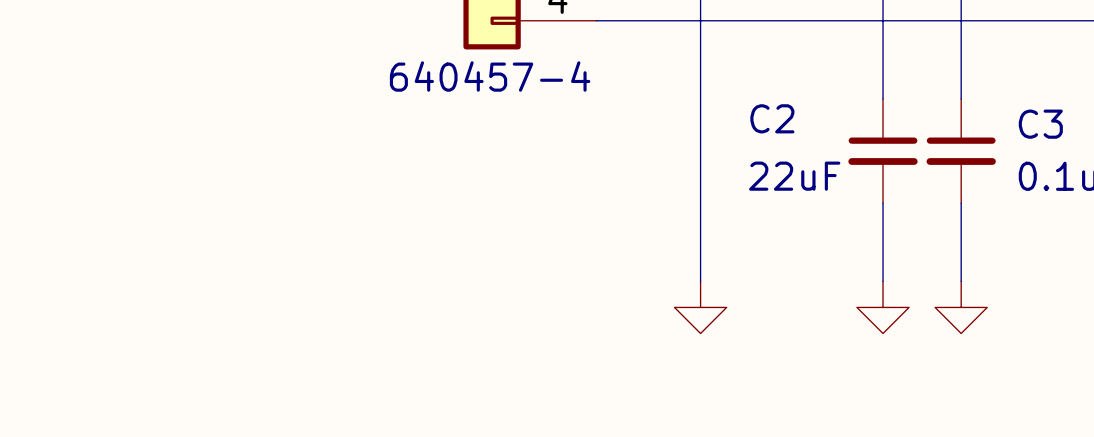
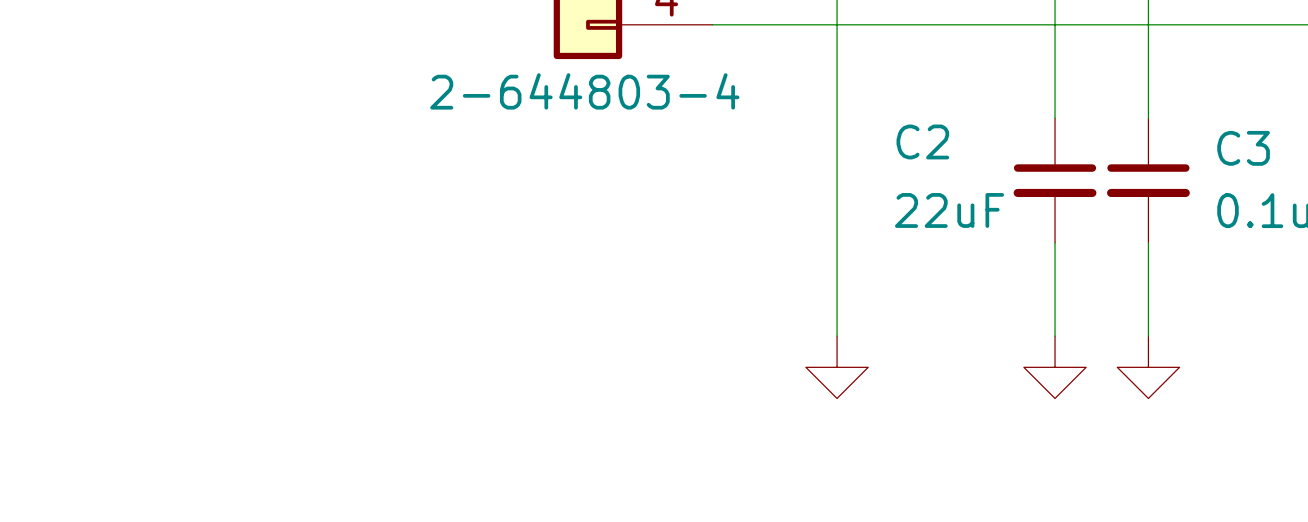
part text: 640457-4 (490, 76) -> 2-644803-4 (584, 91)

